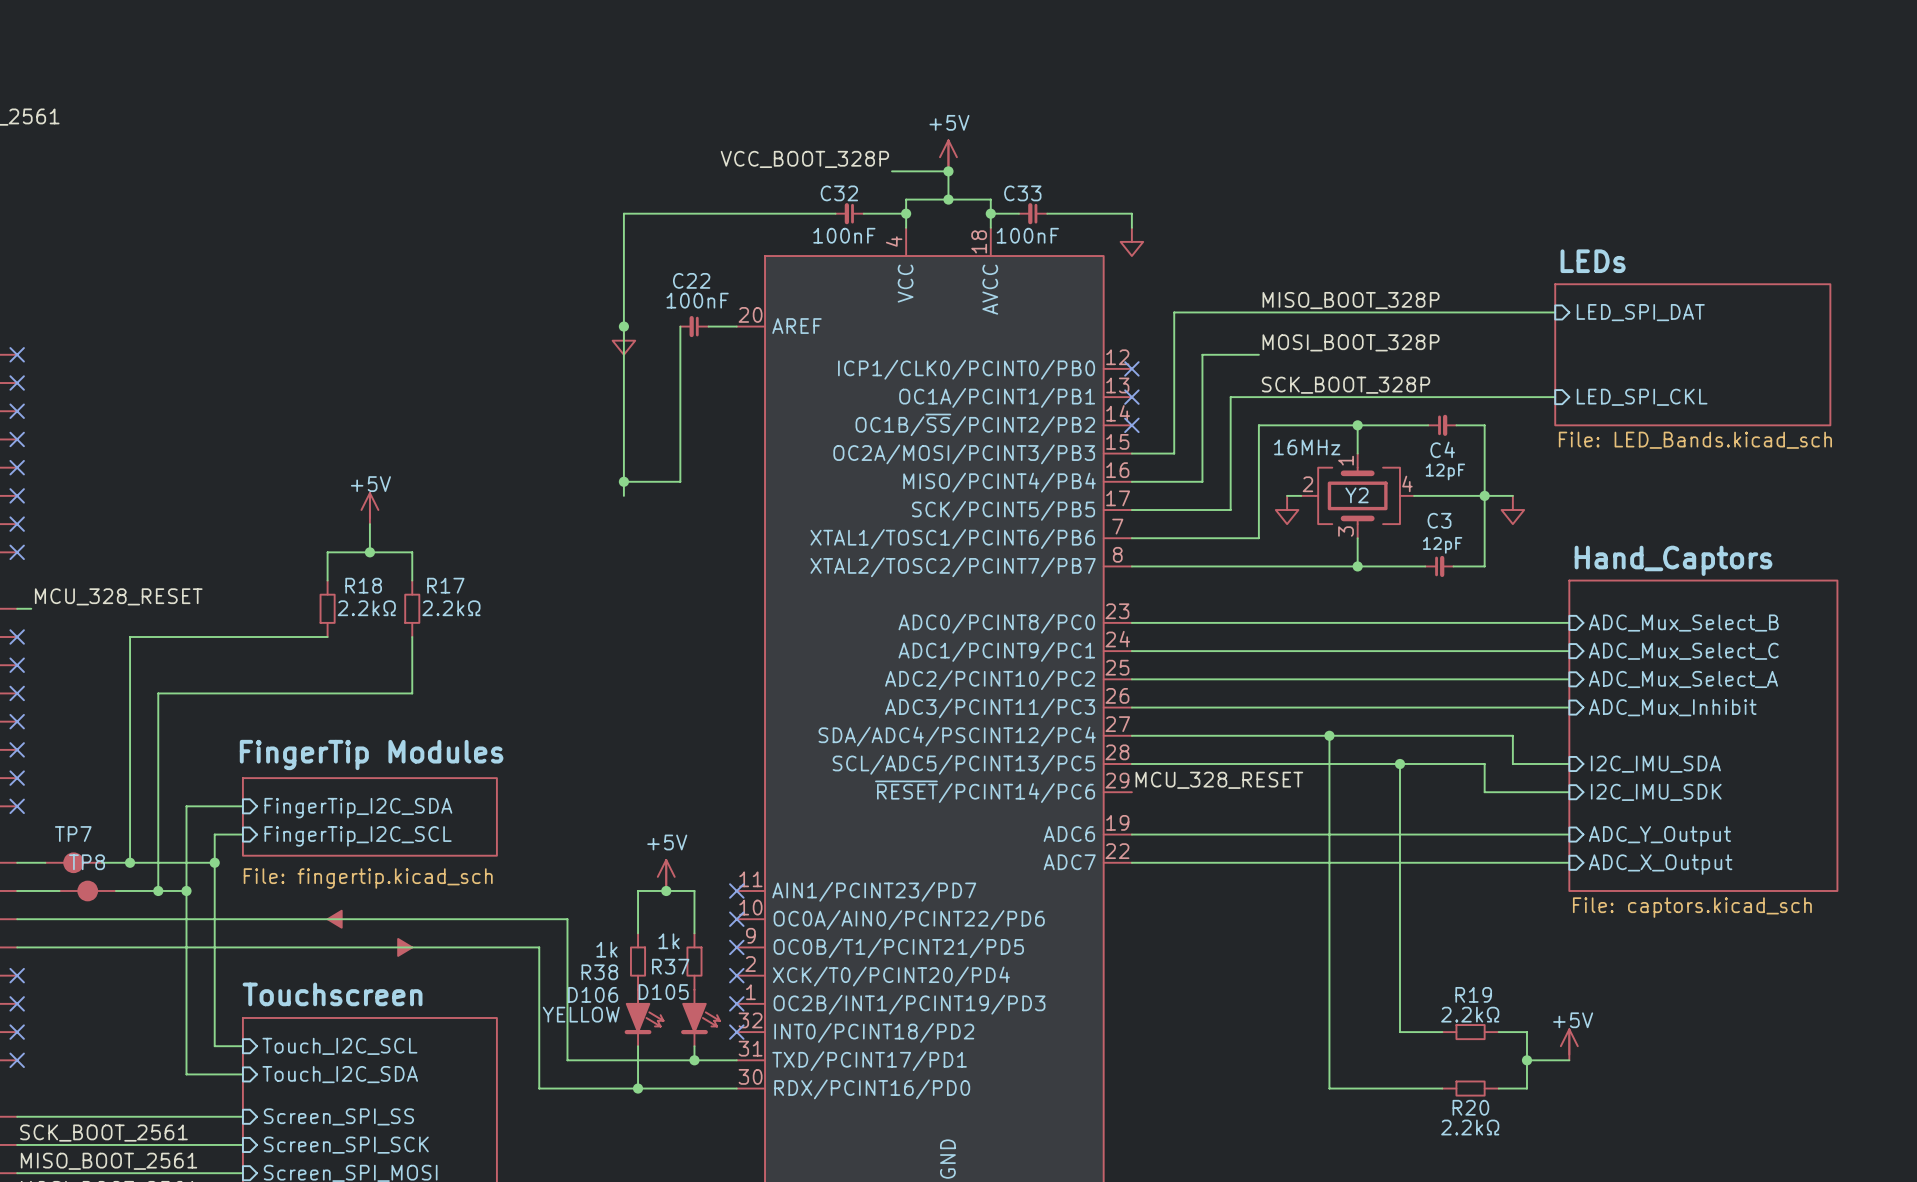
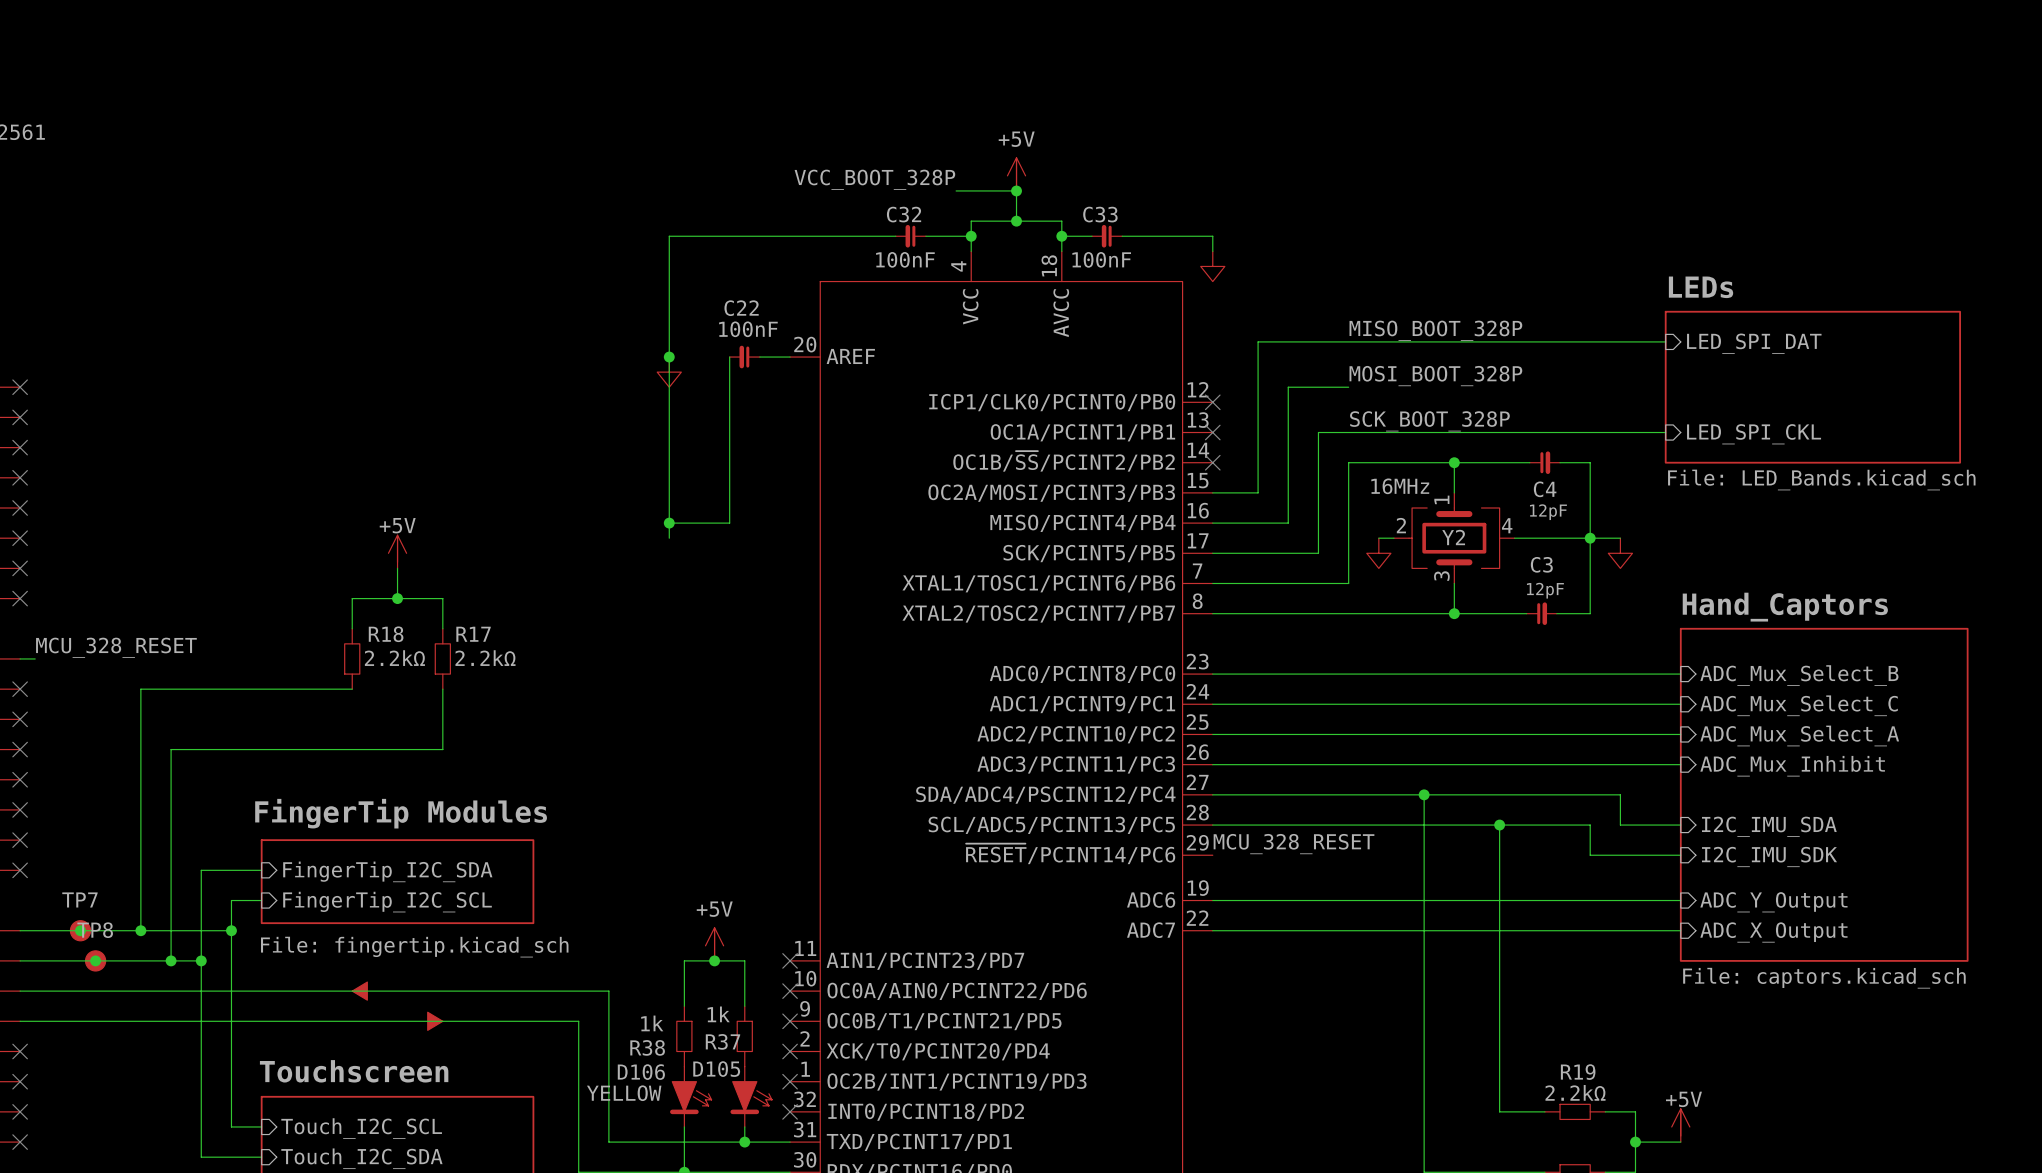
TP7 symbol: [45, 853, 102, 873] -> [70, 920, 91, 941]
junction: none -> (80, 930)
TP8 symbol: [59, 881, 116, 901] -> [85, 950, 106, 971]
junction: none -> (95, 960)

